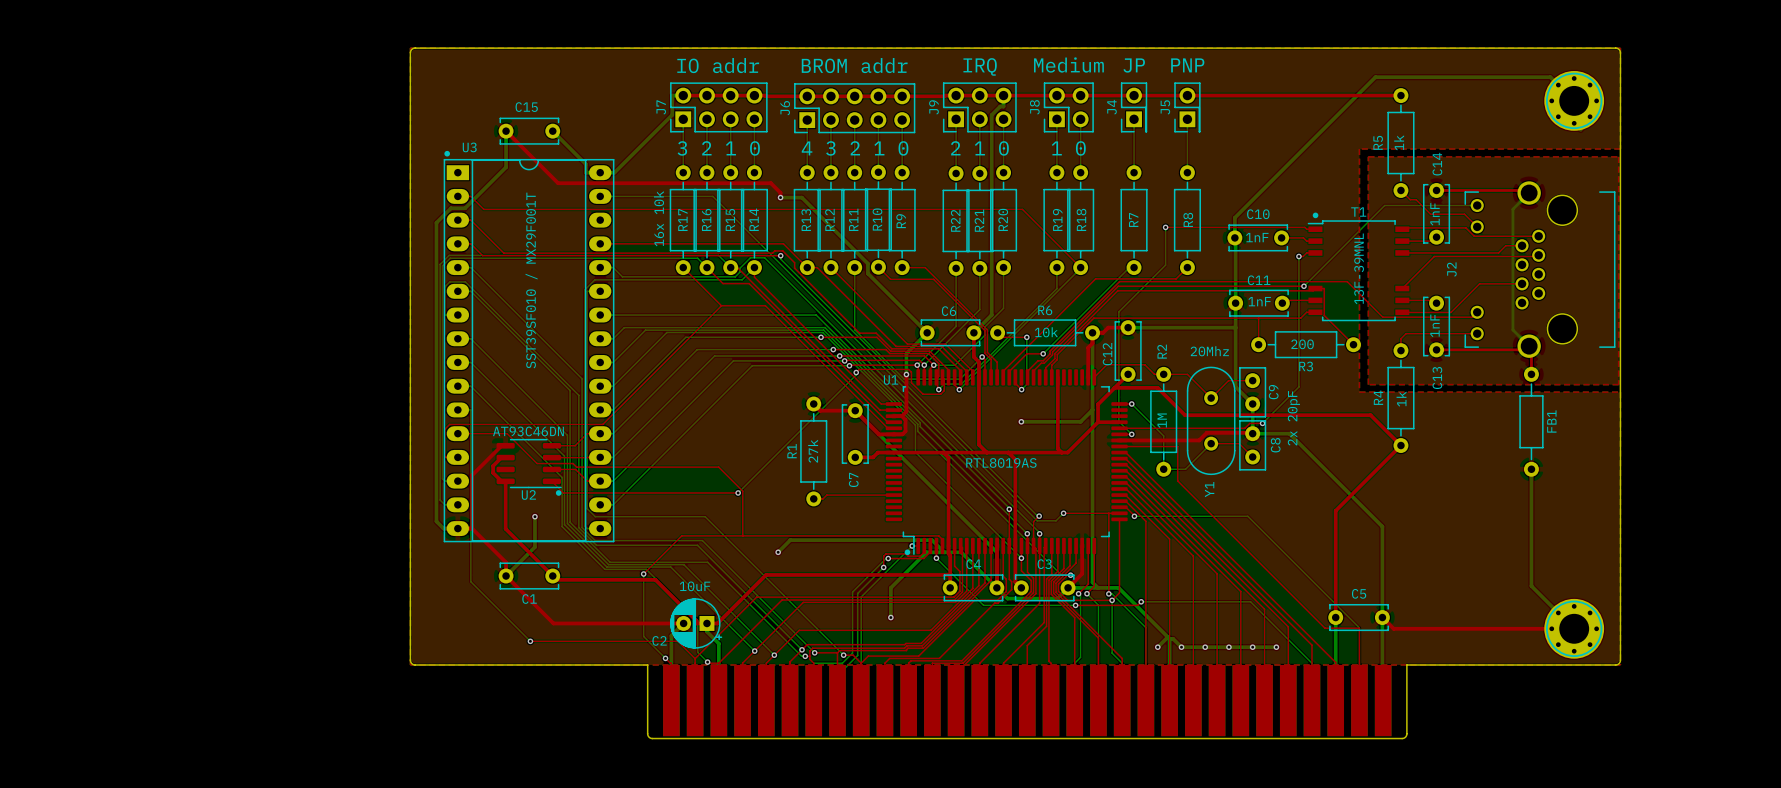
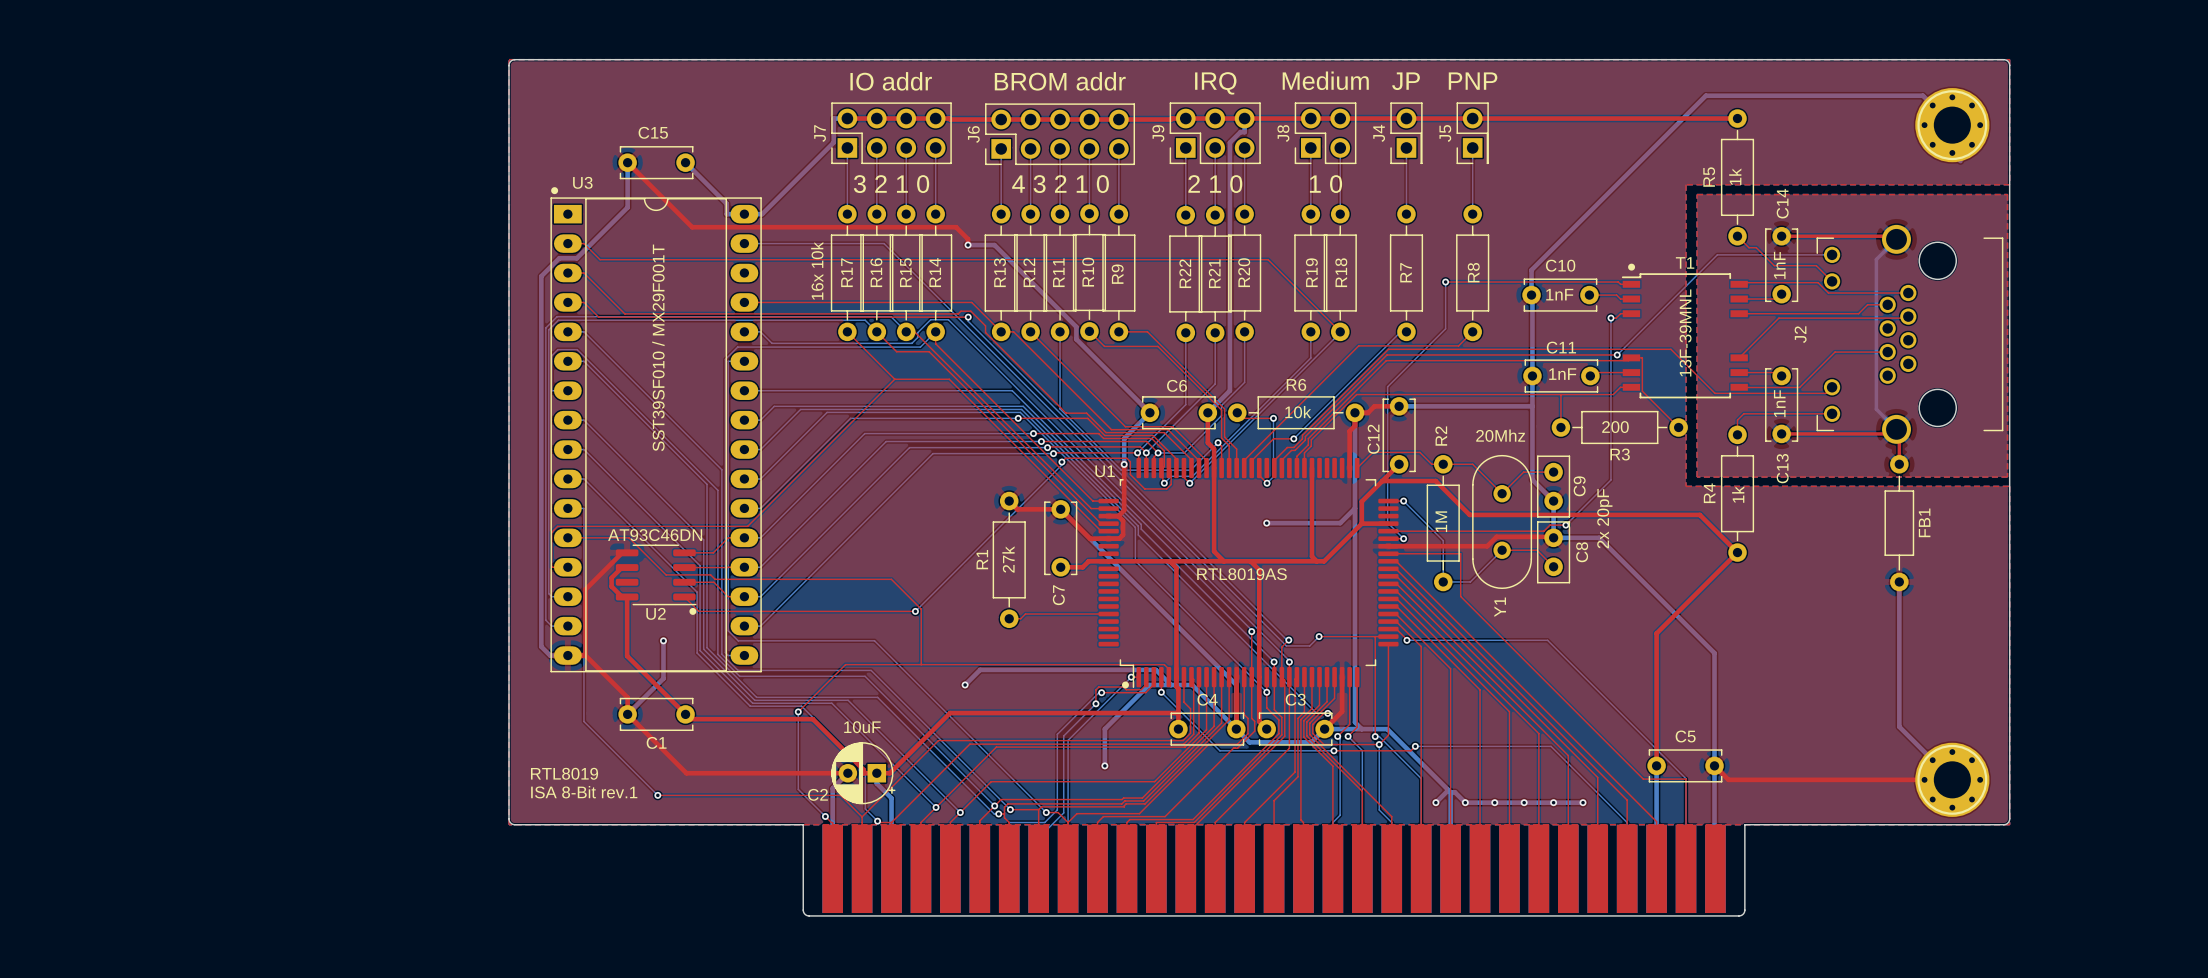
text: none -> RTL8019 (564, 773)
text: none -> ISA 8-Bit rev.1 (584, 792)

